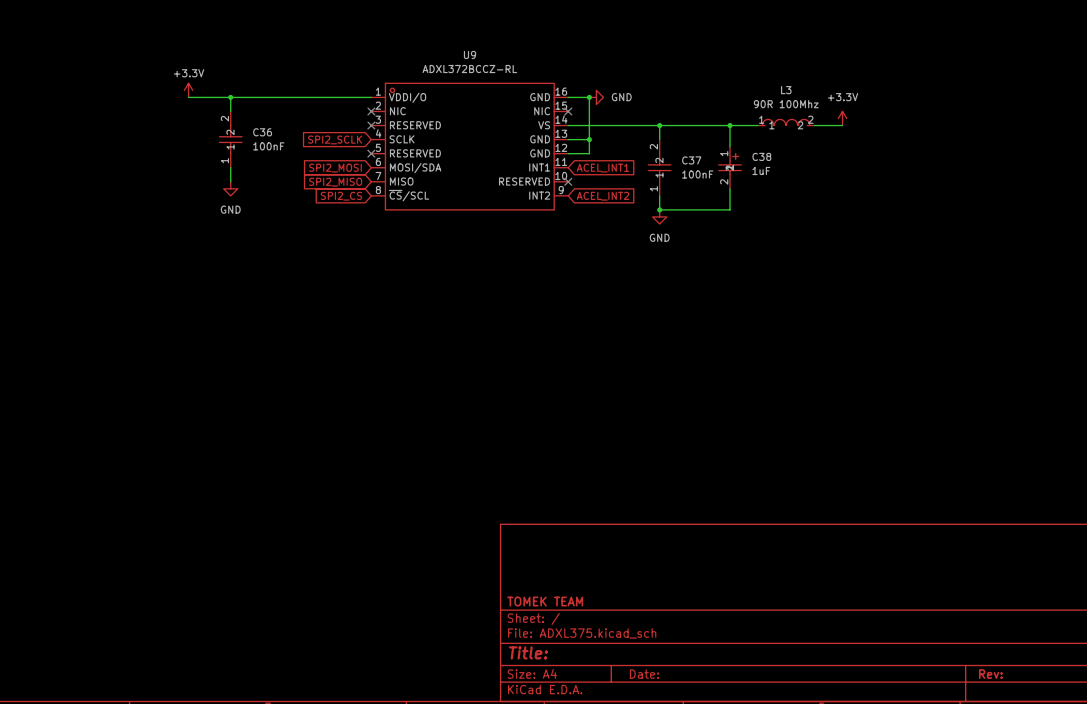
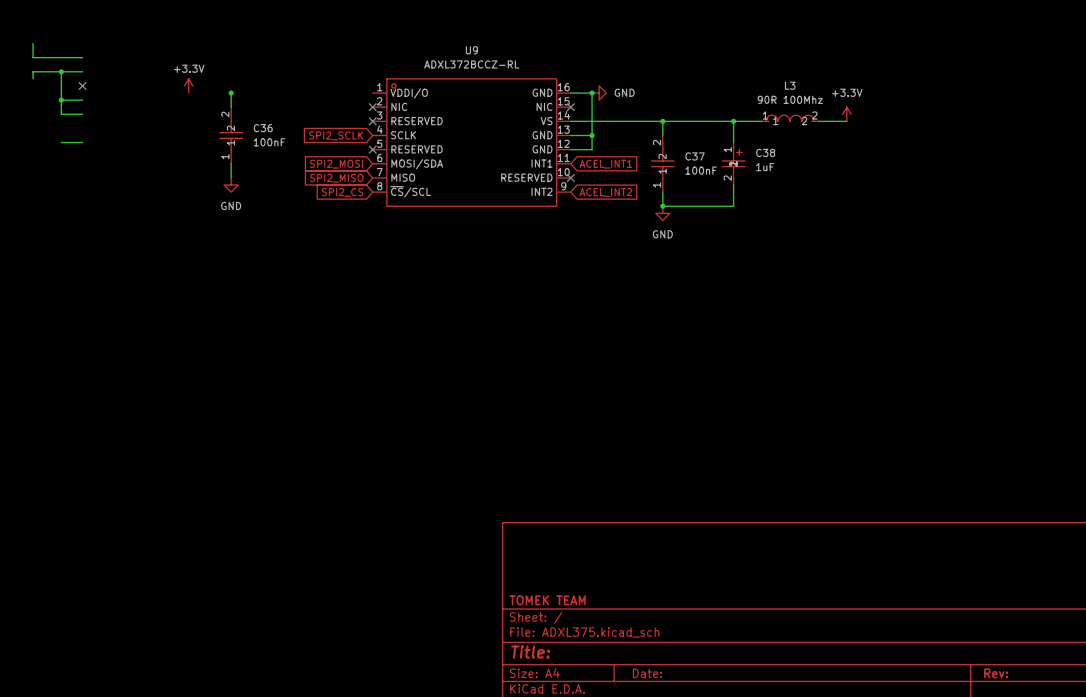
wire: none -> (33, 43) (33, 57) (82, 57)
wire: none -> (61, 71) (61, 114) (82, 114)
junction: none -> (61, 71)
wire: none -> (82, 71) (33, 71) (33, 78)
no-connect mark: none -> (82, 85)
wire: (188, 97) (371, 97) -> none
wire: none -> (61, 100) (82, 100)
junction: none -> (61, 100)
wire: none -> (61, 142) (82, 142)

